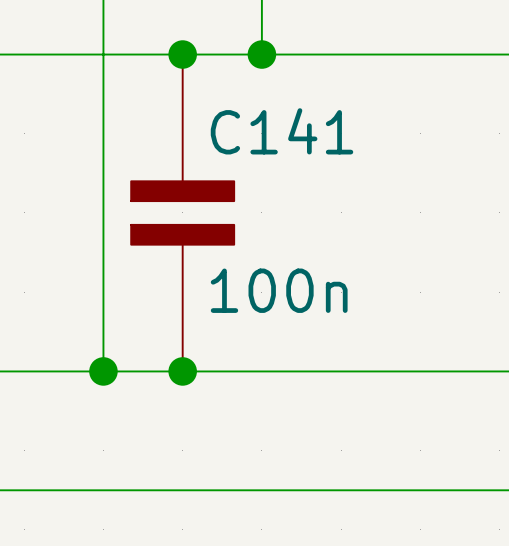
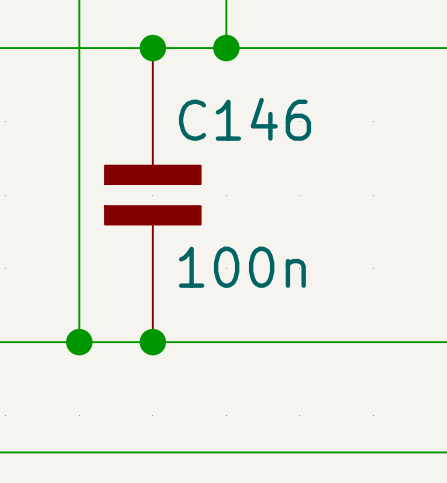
C141 name: C141 (282, 131) -> C146 (245, 119)

